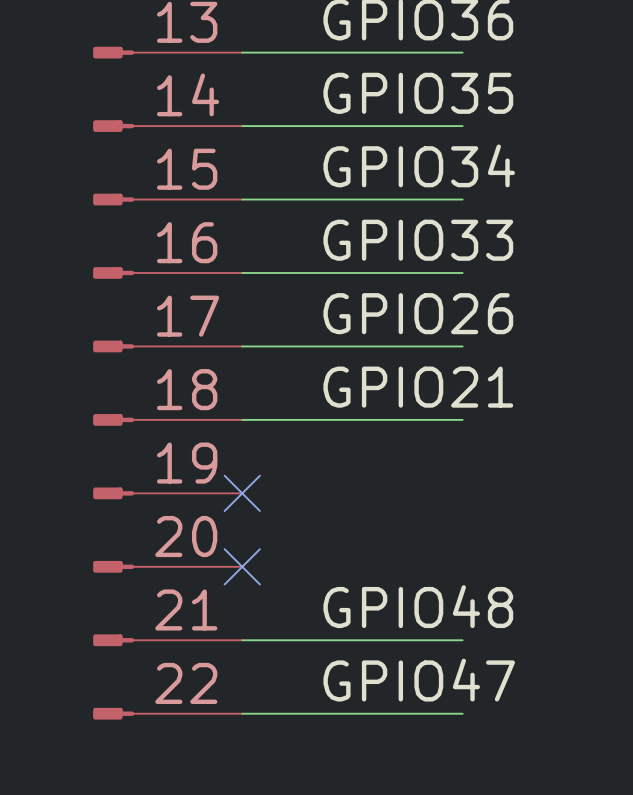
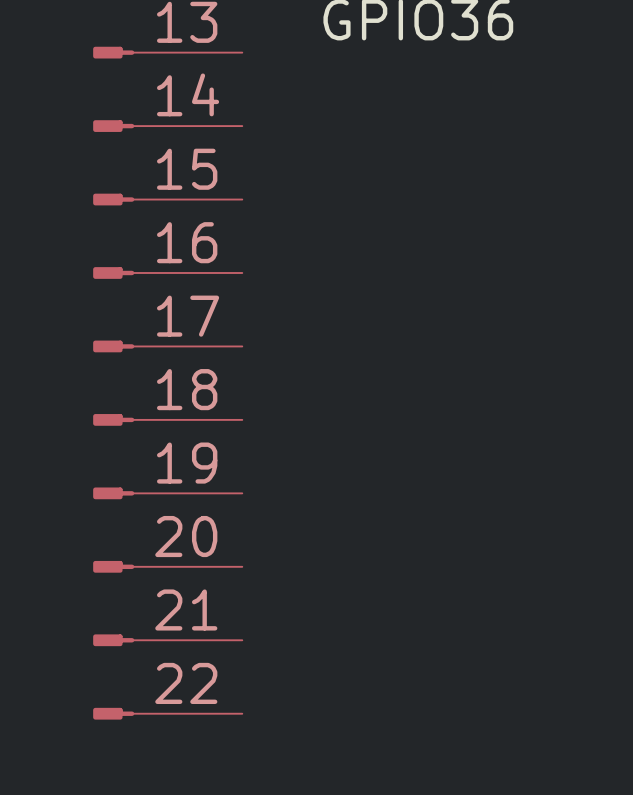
wire: (242, 52) (462, 52) -> none
label: GPIO35 (418, 93) -> none
wire: (242, 126) (462, 126) -> none
label: GPIO34 (419, 165) -> none
wire: (242, 199) (462, 199) -> none
label: GPIO33 (418, 240) -> none
wire: (242, 272) (462, 272) -> none
label: GPIO26 (418, 313) -> none
wire: (242, 346) (462, 346) -> none
label: GPIO21 (418, 387) -> none
wire: (242, 419) (462, 419) -> none
no-connect mark: (242, 493) -> none
no-connect mark: (242, 566) -> none
label: GPIO48 (418, 606) -> none
wire: (242, 640) (462, 640) -> none
label: GPIO47 (419, 680) -> none
wire: (242, 713) (462, 713) -> none

